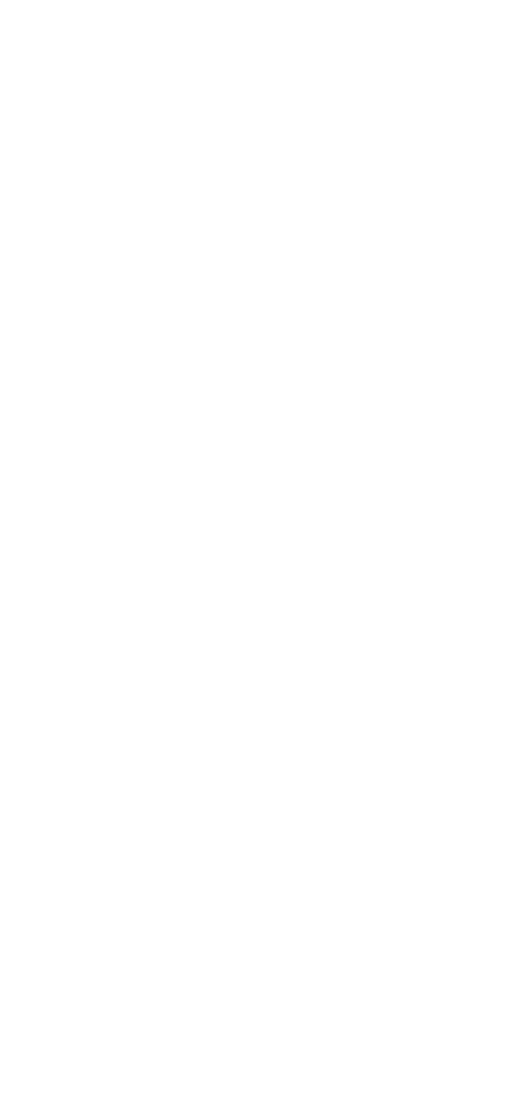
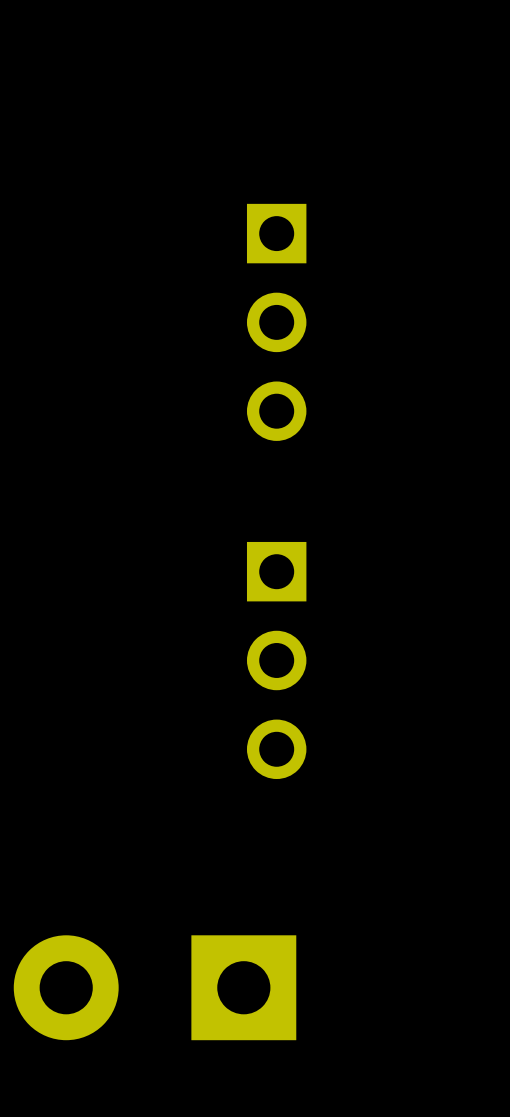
part: none -> (276, 322)
part: none -> (276, 660)
part: none -> (155, 987)

